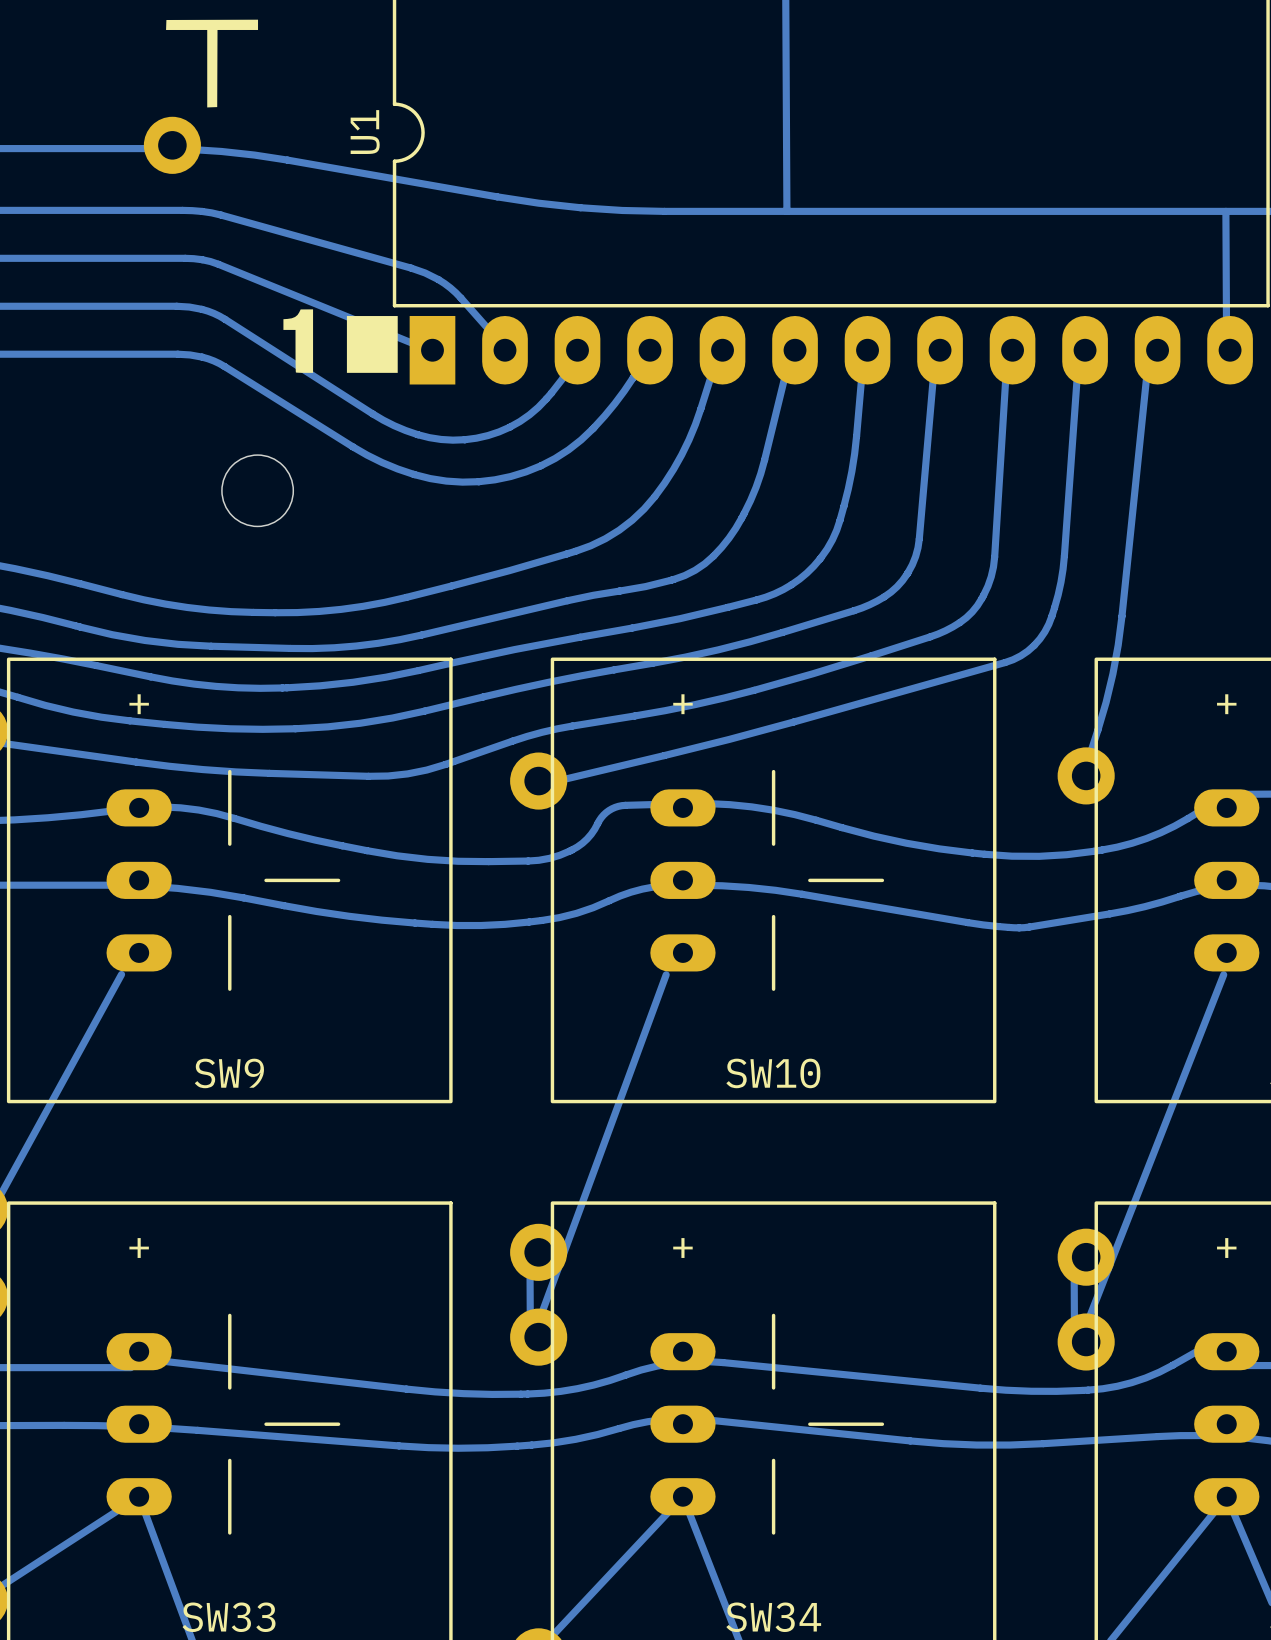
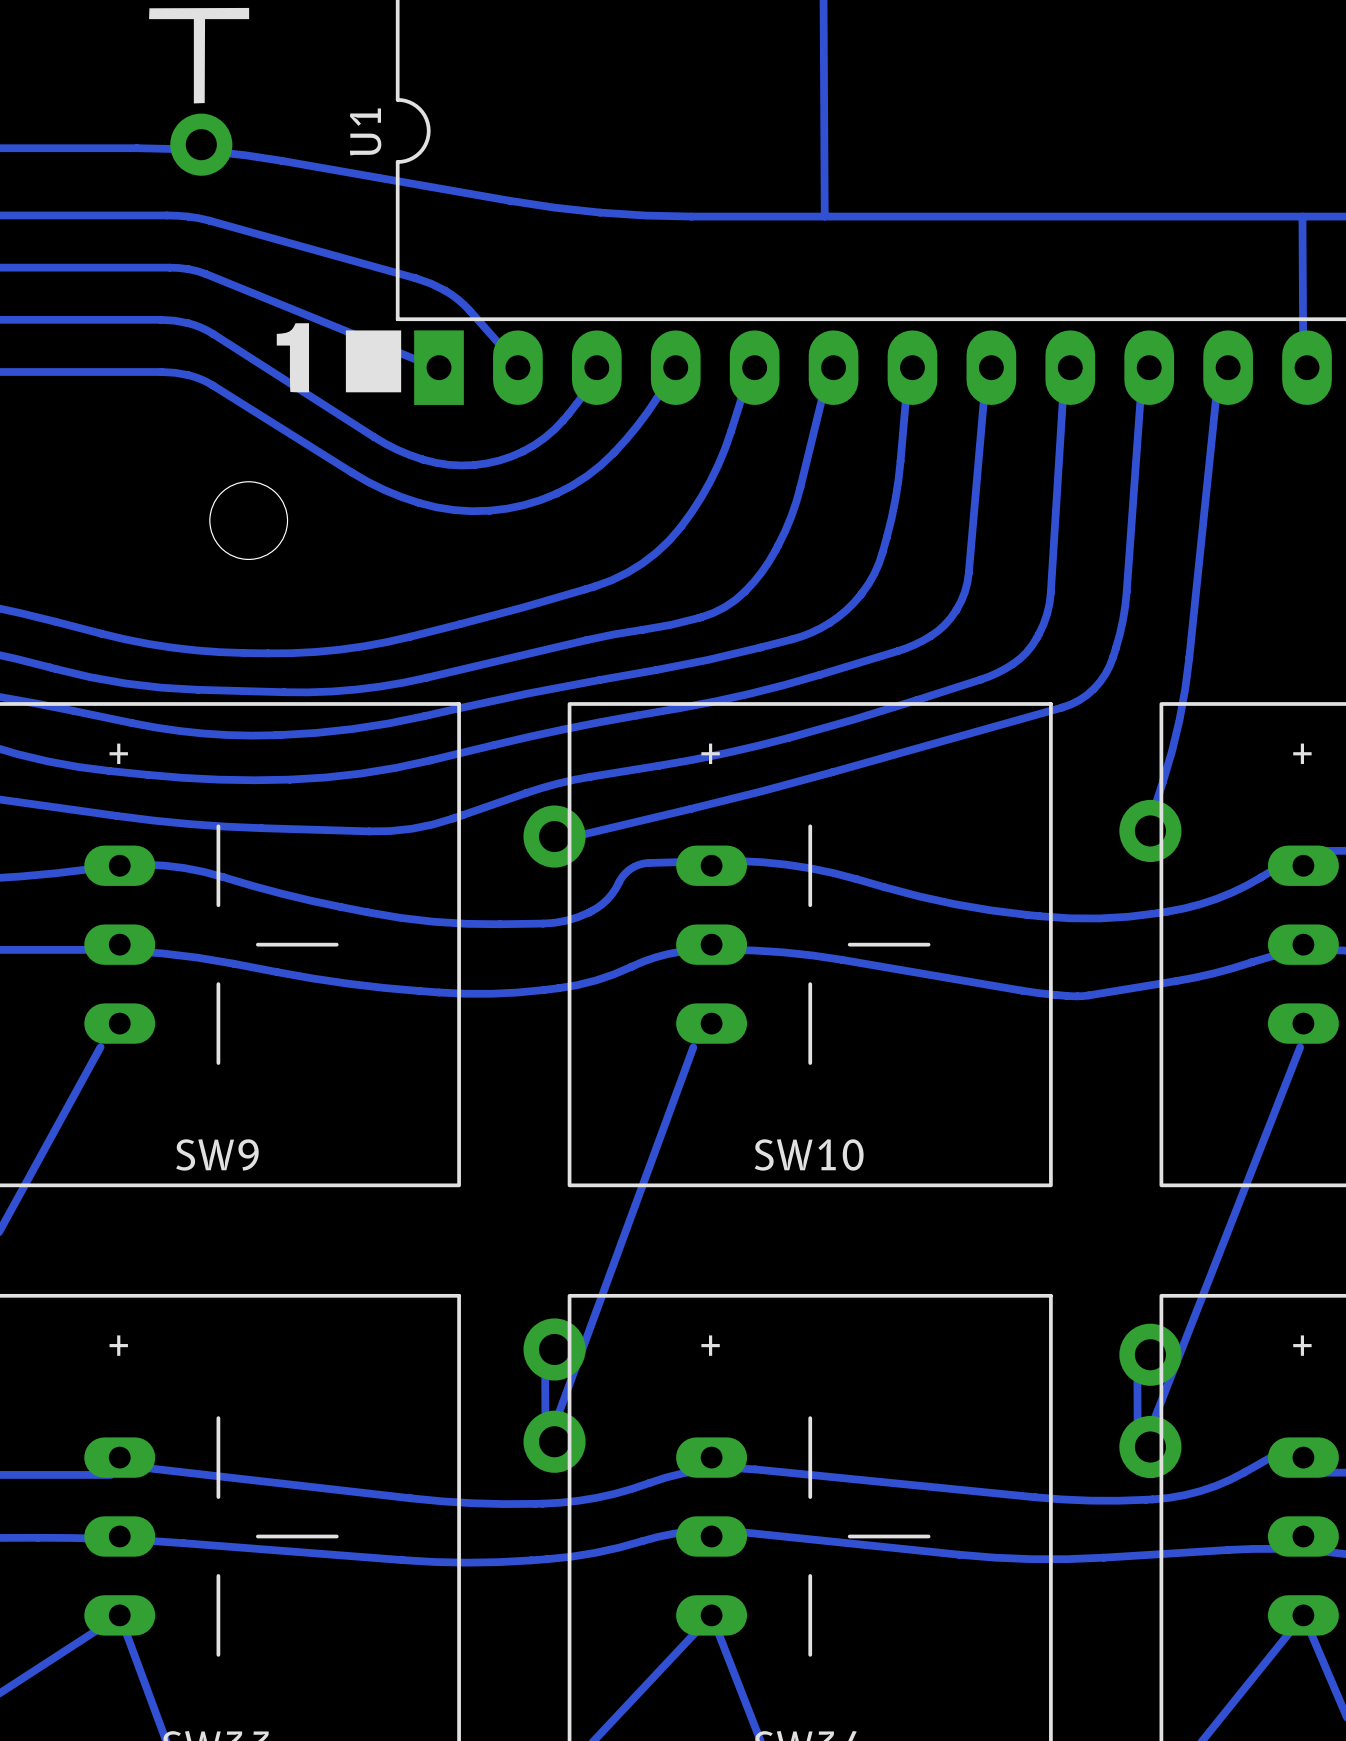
part position: (172, 145) -> (201, 144)

